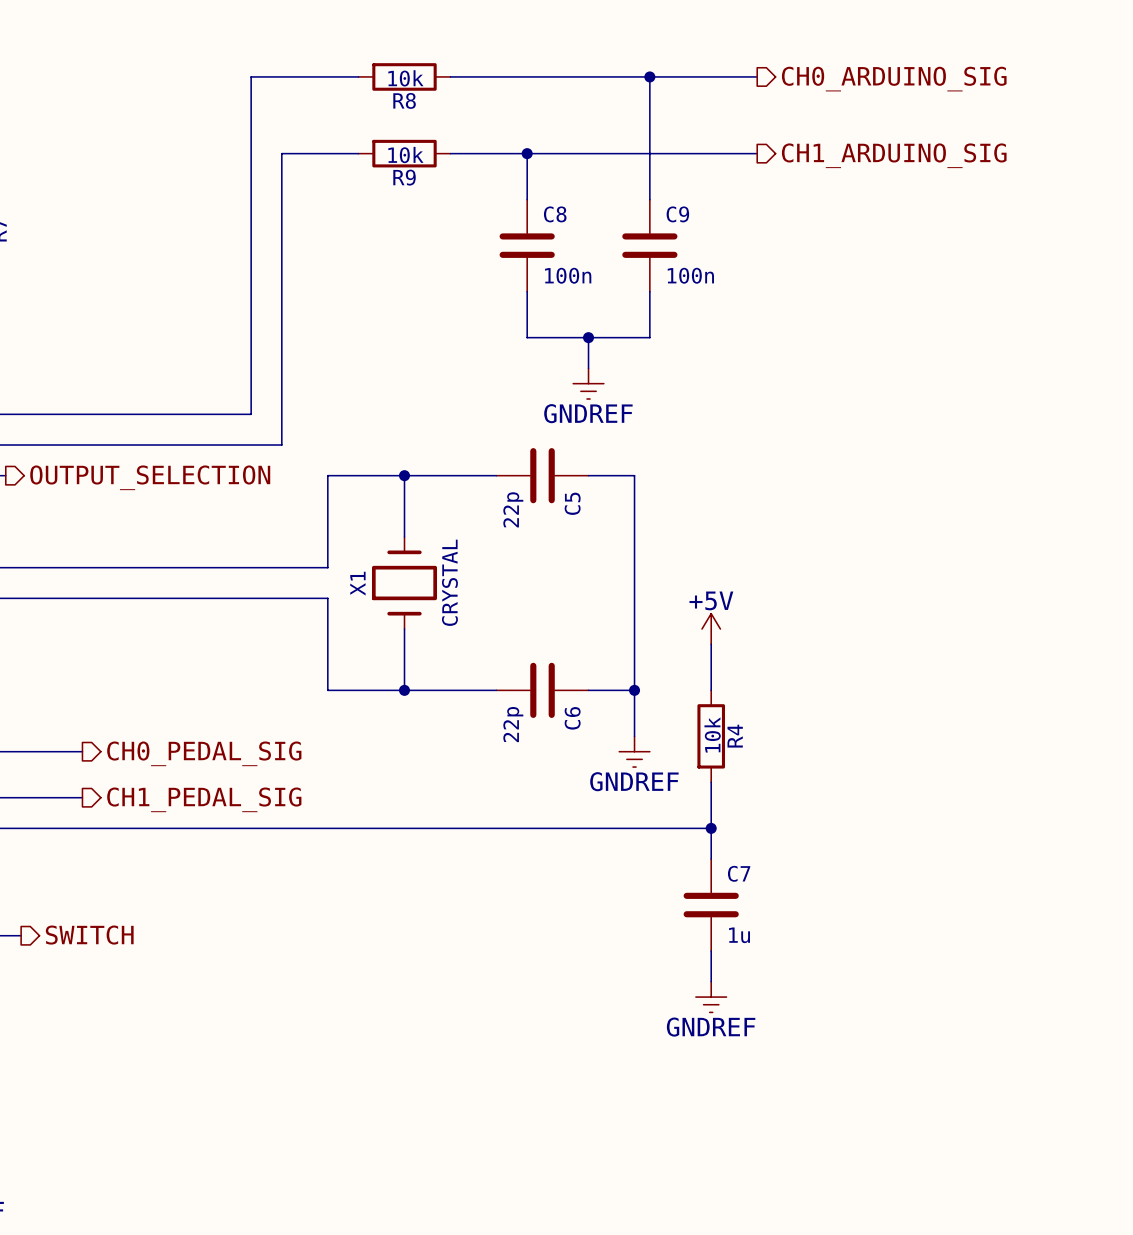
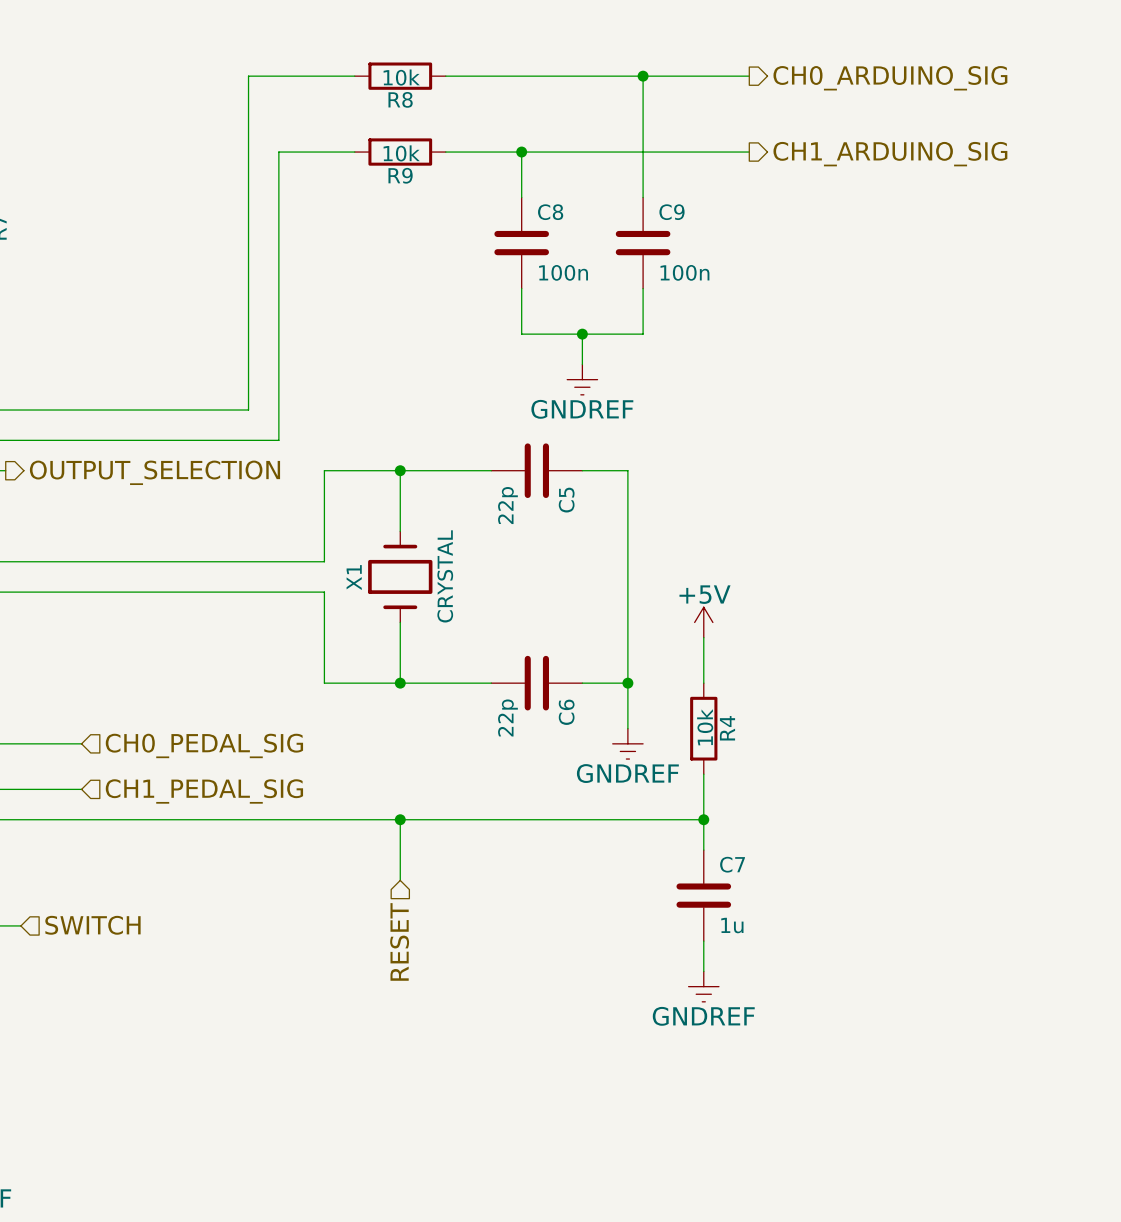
hierarchical label shape: output (204, 753) -> input (204, 745)
hierarchical label shape: output (204, 799) -> input (204, 791)
wire: none -> (400, 819) (400, 880)
junction: none -> (400, 819)
hierarchical label shape: output (89, 935) -> input (92, 925)
hierarchical label: none -> RESET (399, 941)

